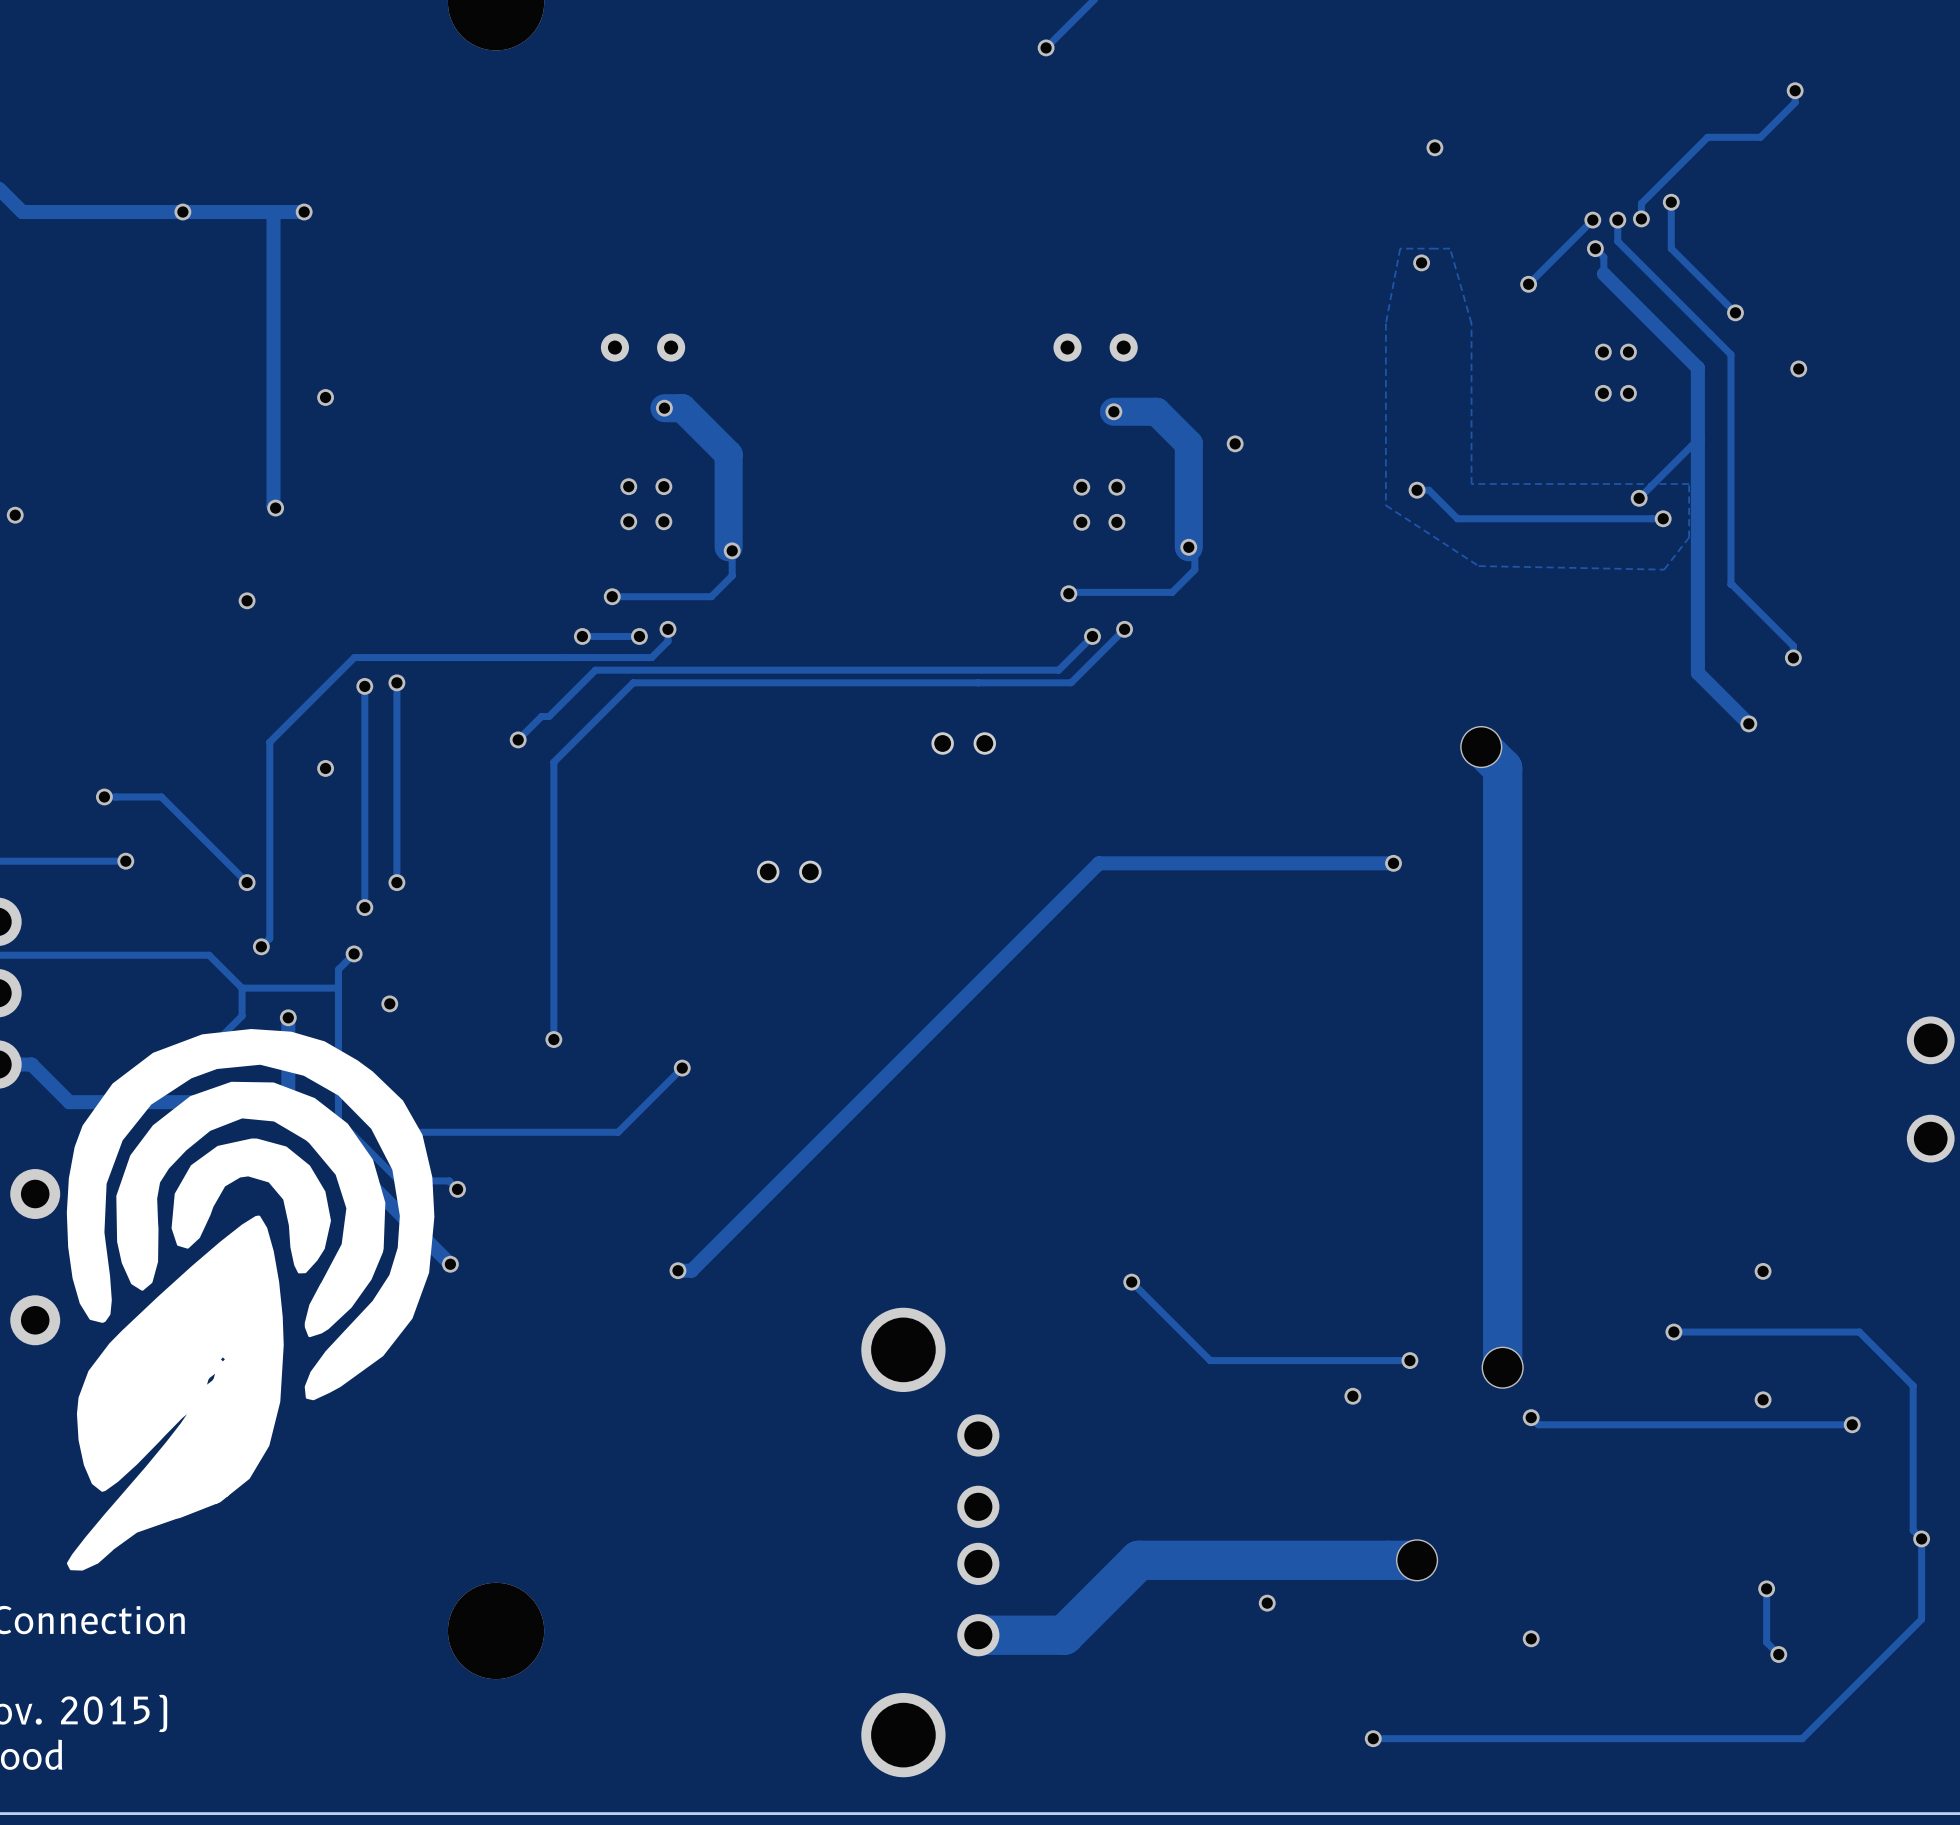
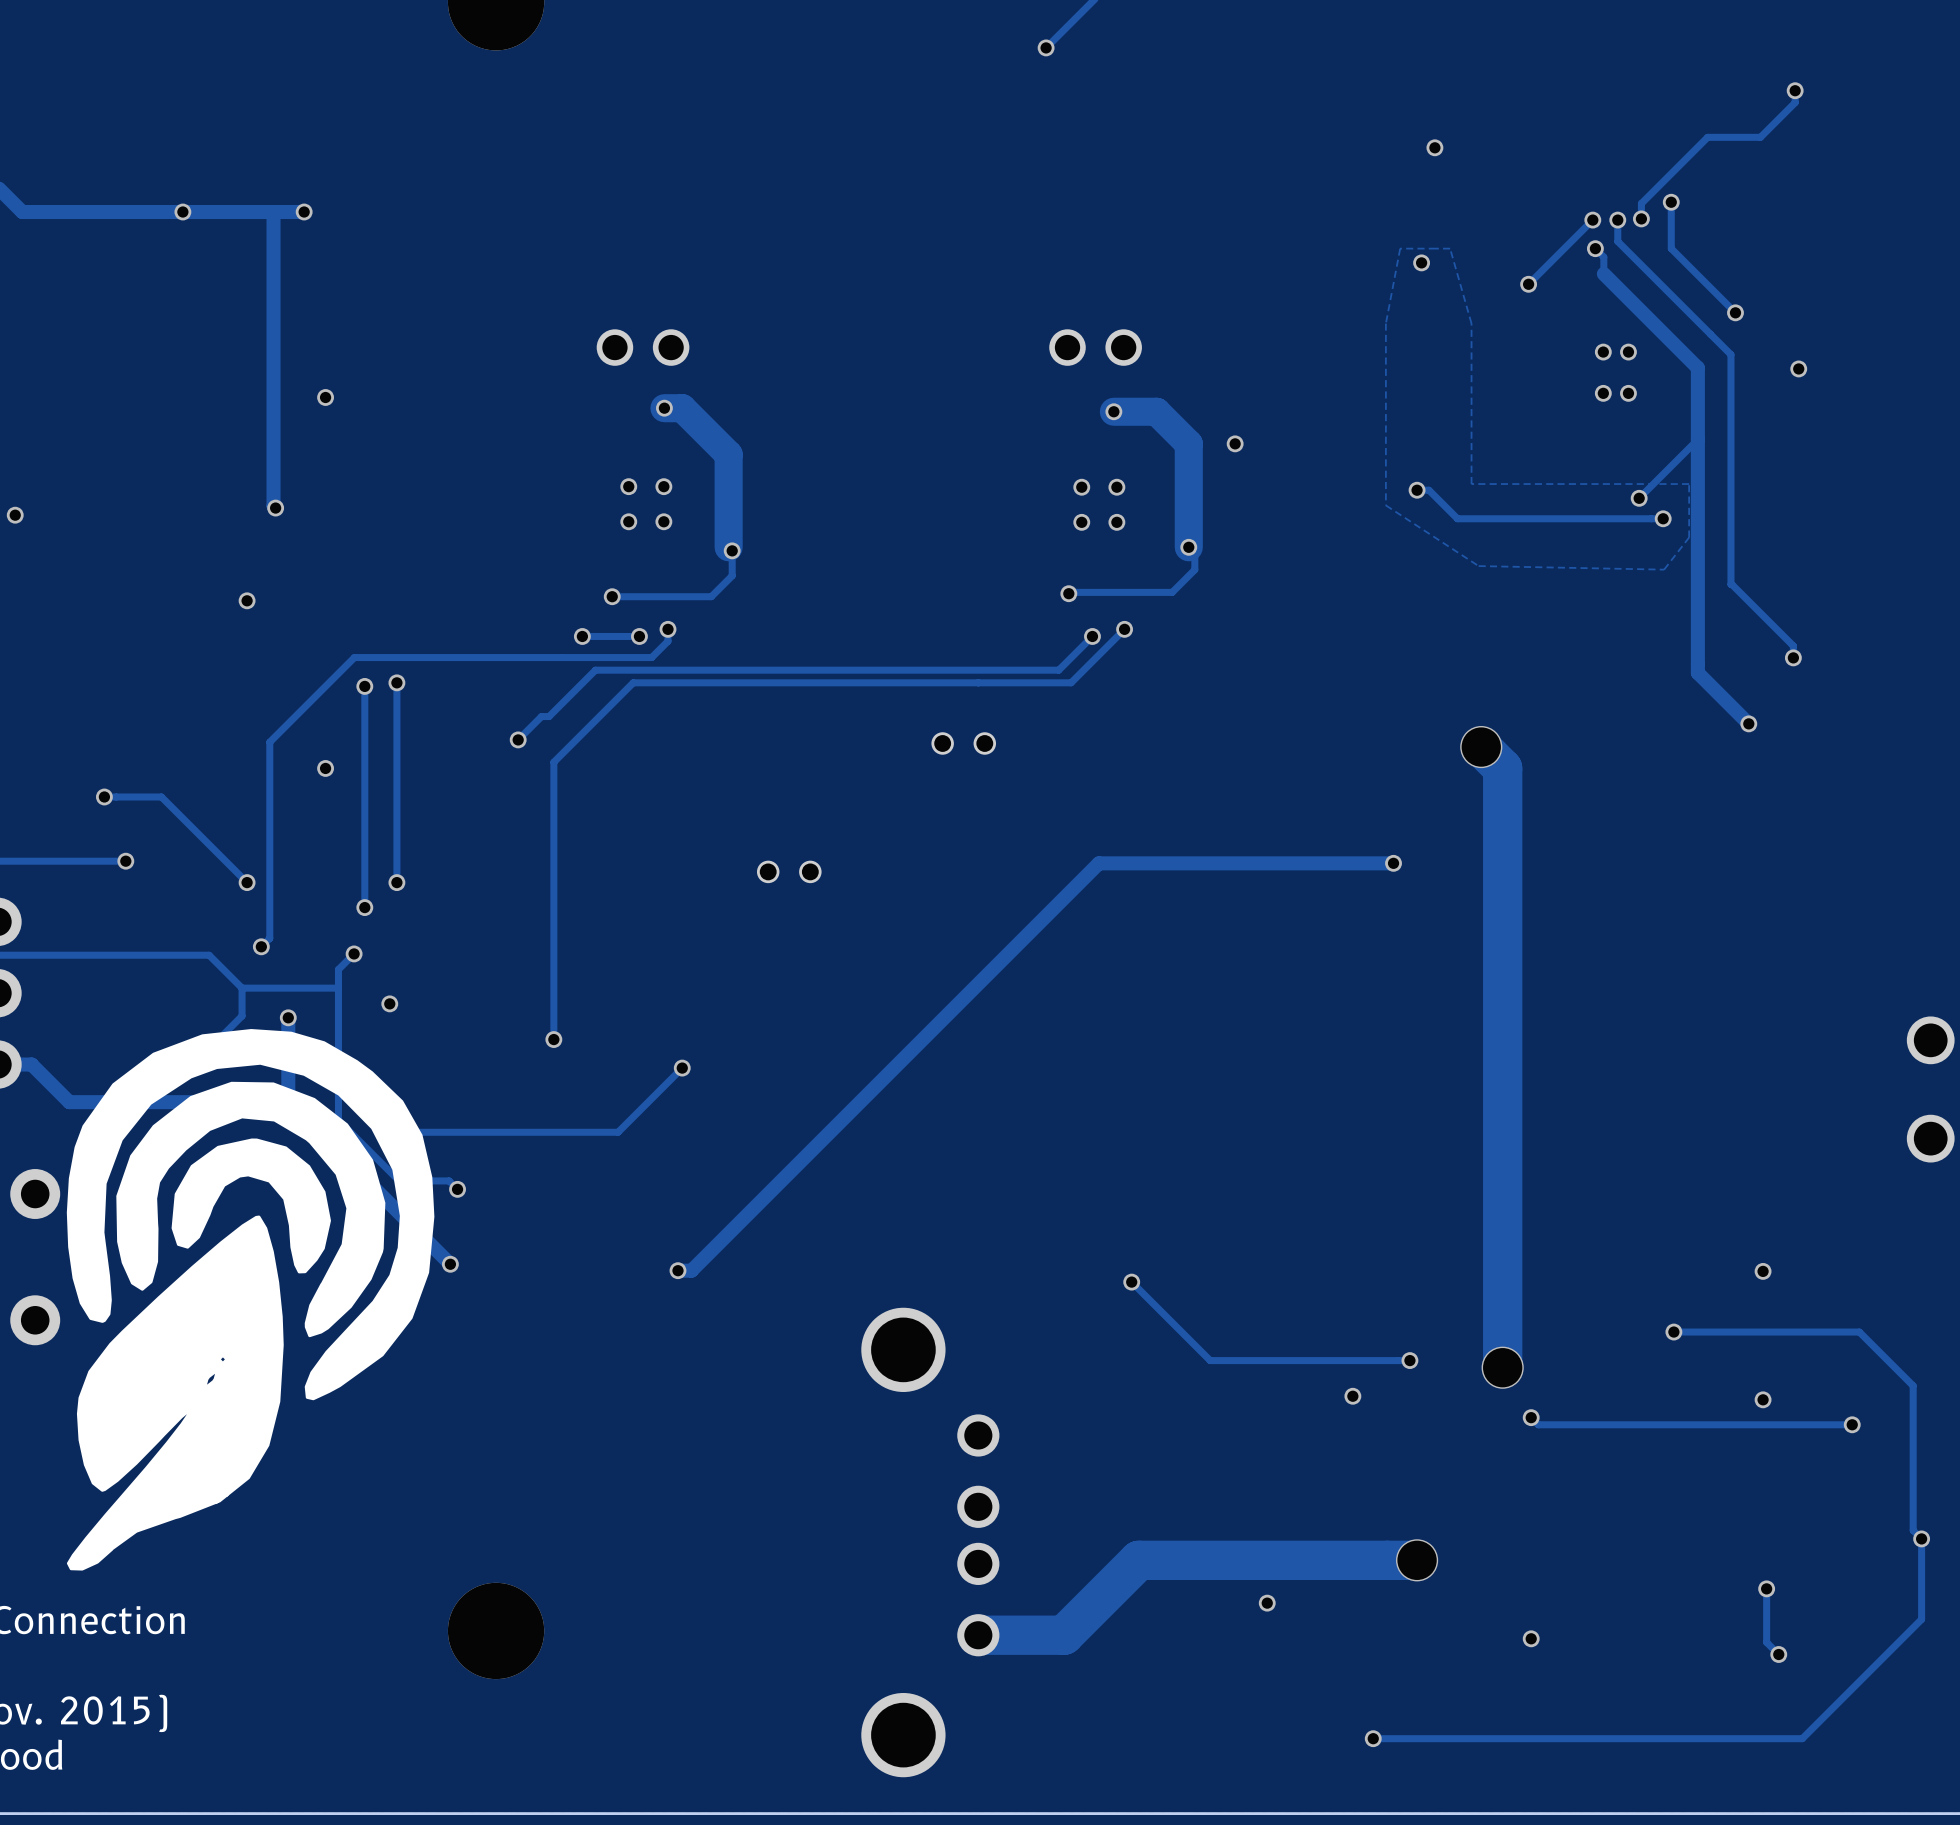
part footprint: [600, 333, 686, 362] -> [596, 329, 690, 366]
part footprint: [1053, 333, 1138, 362] -> [1049, 329, 1142, 366]

